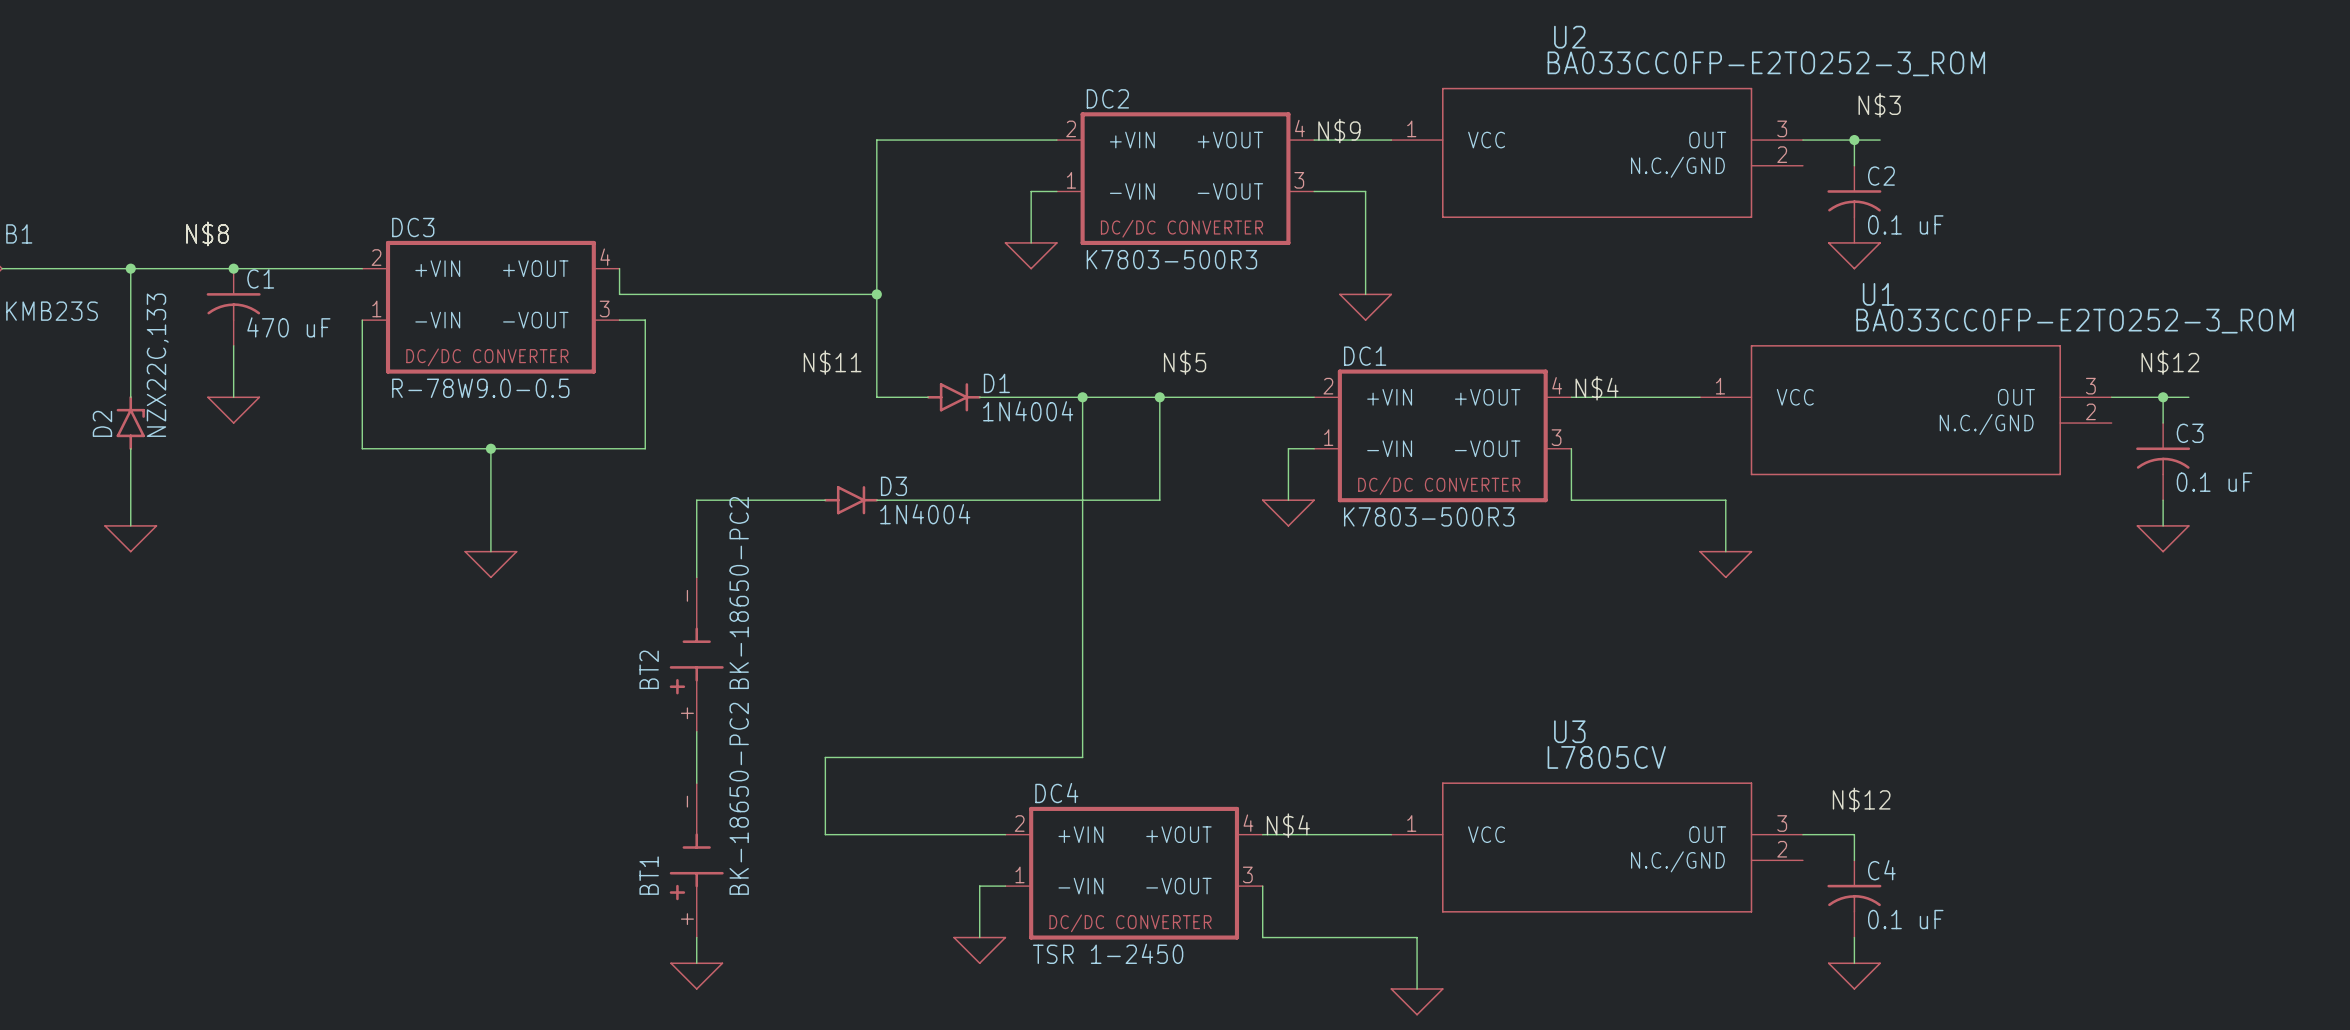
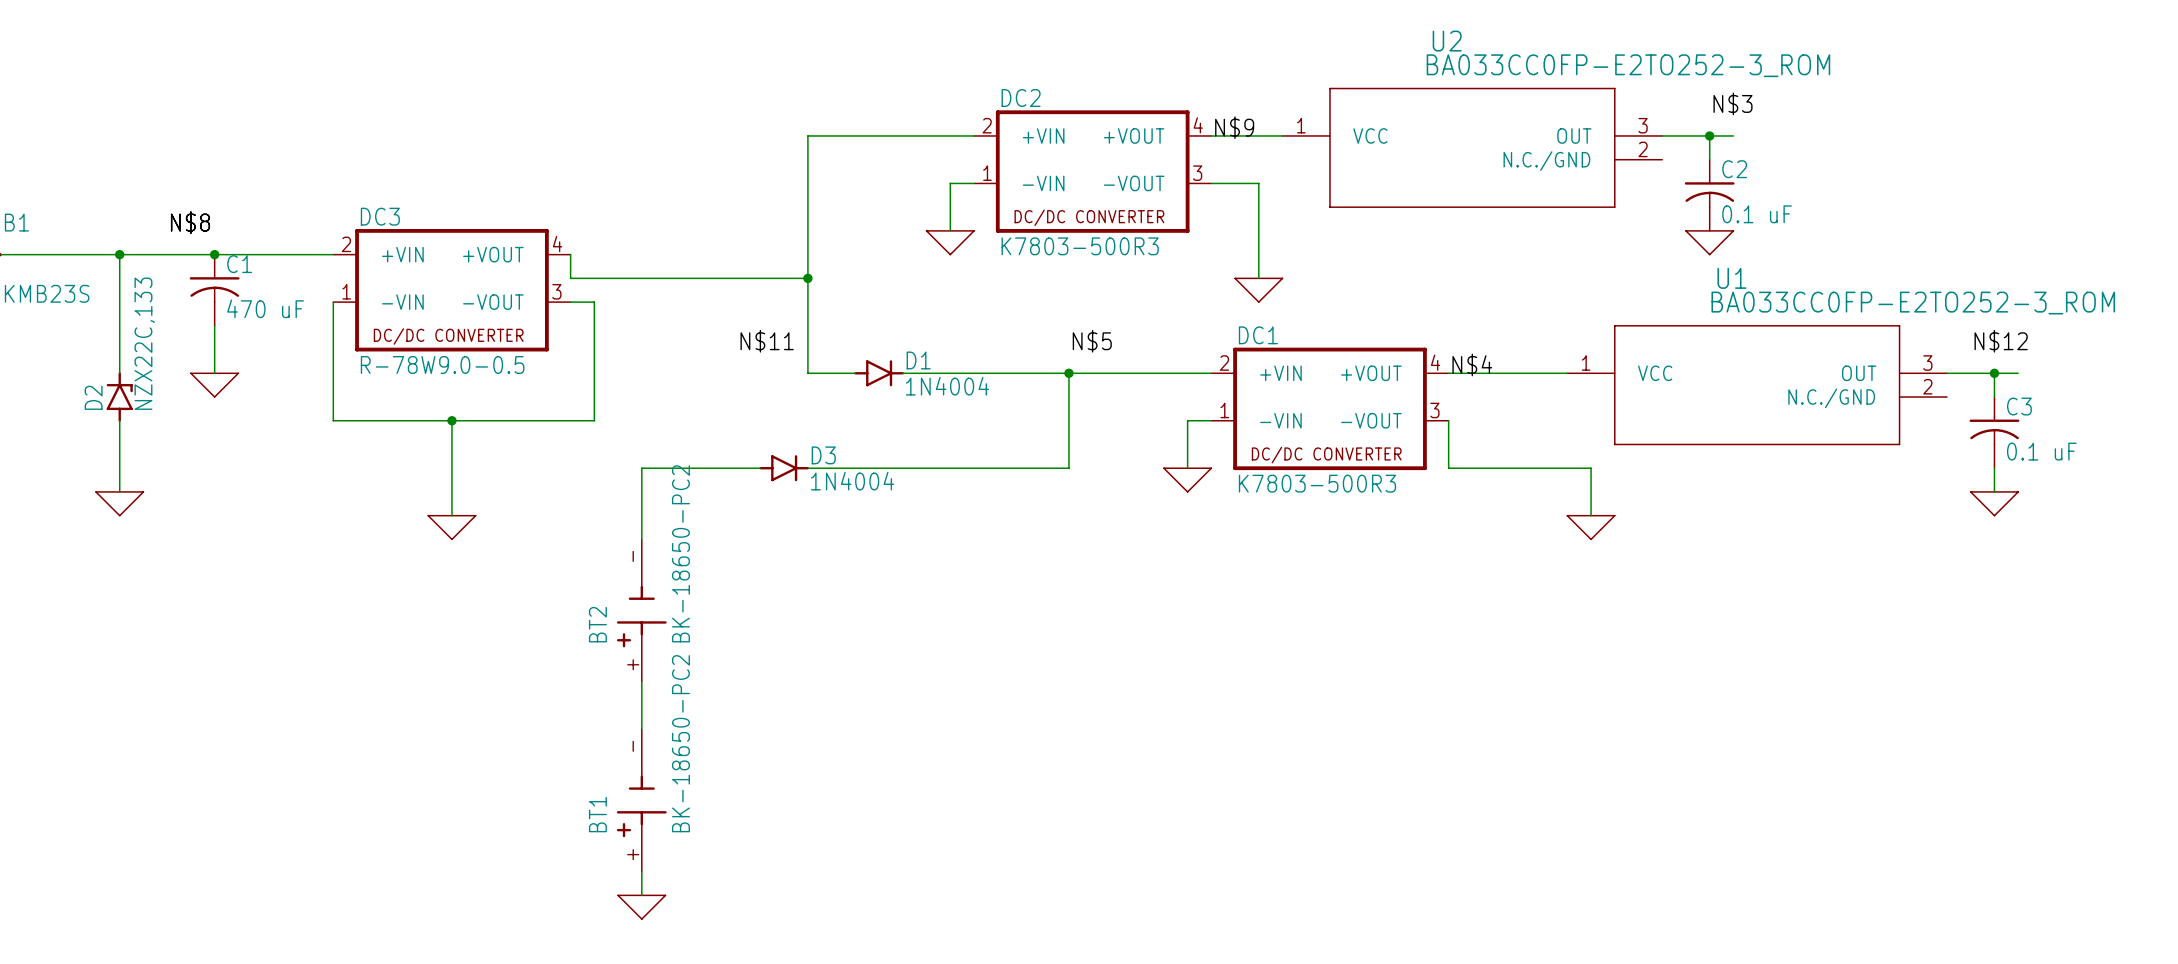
wire: (1082, 397) (1082, 757) (825, 757) (825, 834) (1005, 834) -> none
junction: (1082, 397) -> none
label: N$12 (1861, 799) -> none
label: N$4 (1288, 825) -> none
wire: (1262, 834) (1391, 834) -> none
wire: (1802, 834) (1854, 834) (1854, 860) -> none
U3: L7805CV (1597, 847) -> none
DC4: TSR 1-2450 (1134, 873) -> none
wire: (1005, 886) (979, 886) (979, 937) -> none
wire: (1262, 886) (1262, 937) (1417, 937) (1417, 989) -> none
C4: 0.1 uF (1854, 898) -> none
wire: (1854, 937) (1854, 963) -> none
power symbol: (979, 950) -> none
power symbol: (1854, 976) -> none
power symbol: (1417, 1001) -> none

